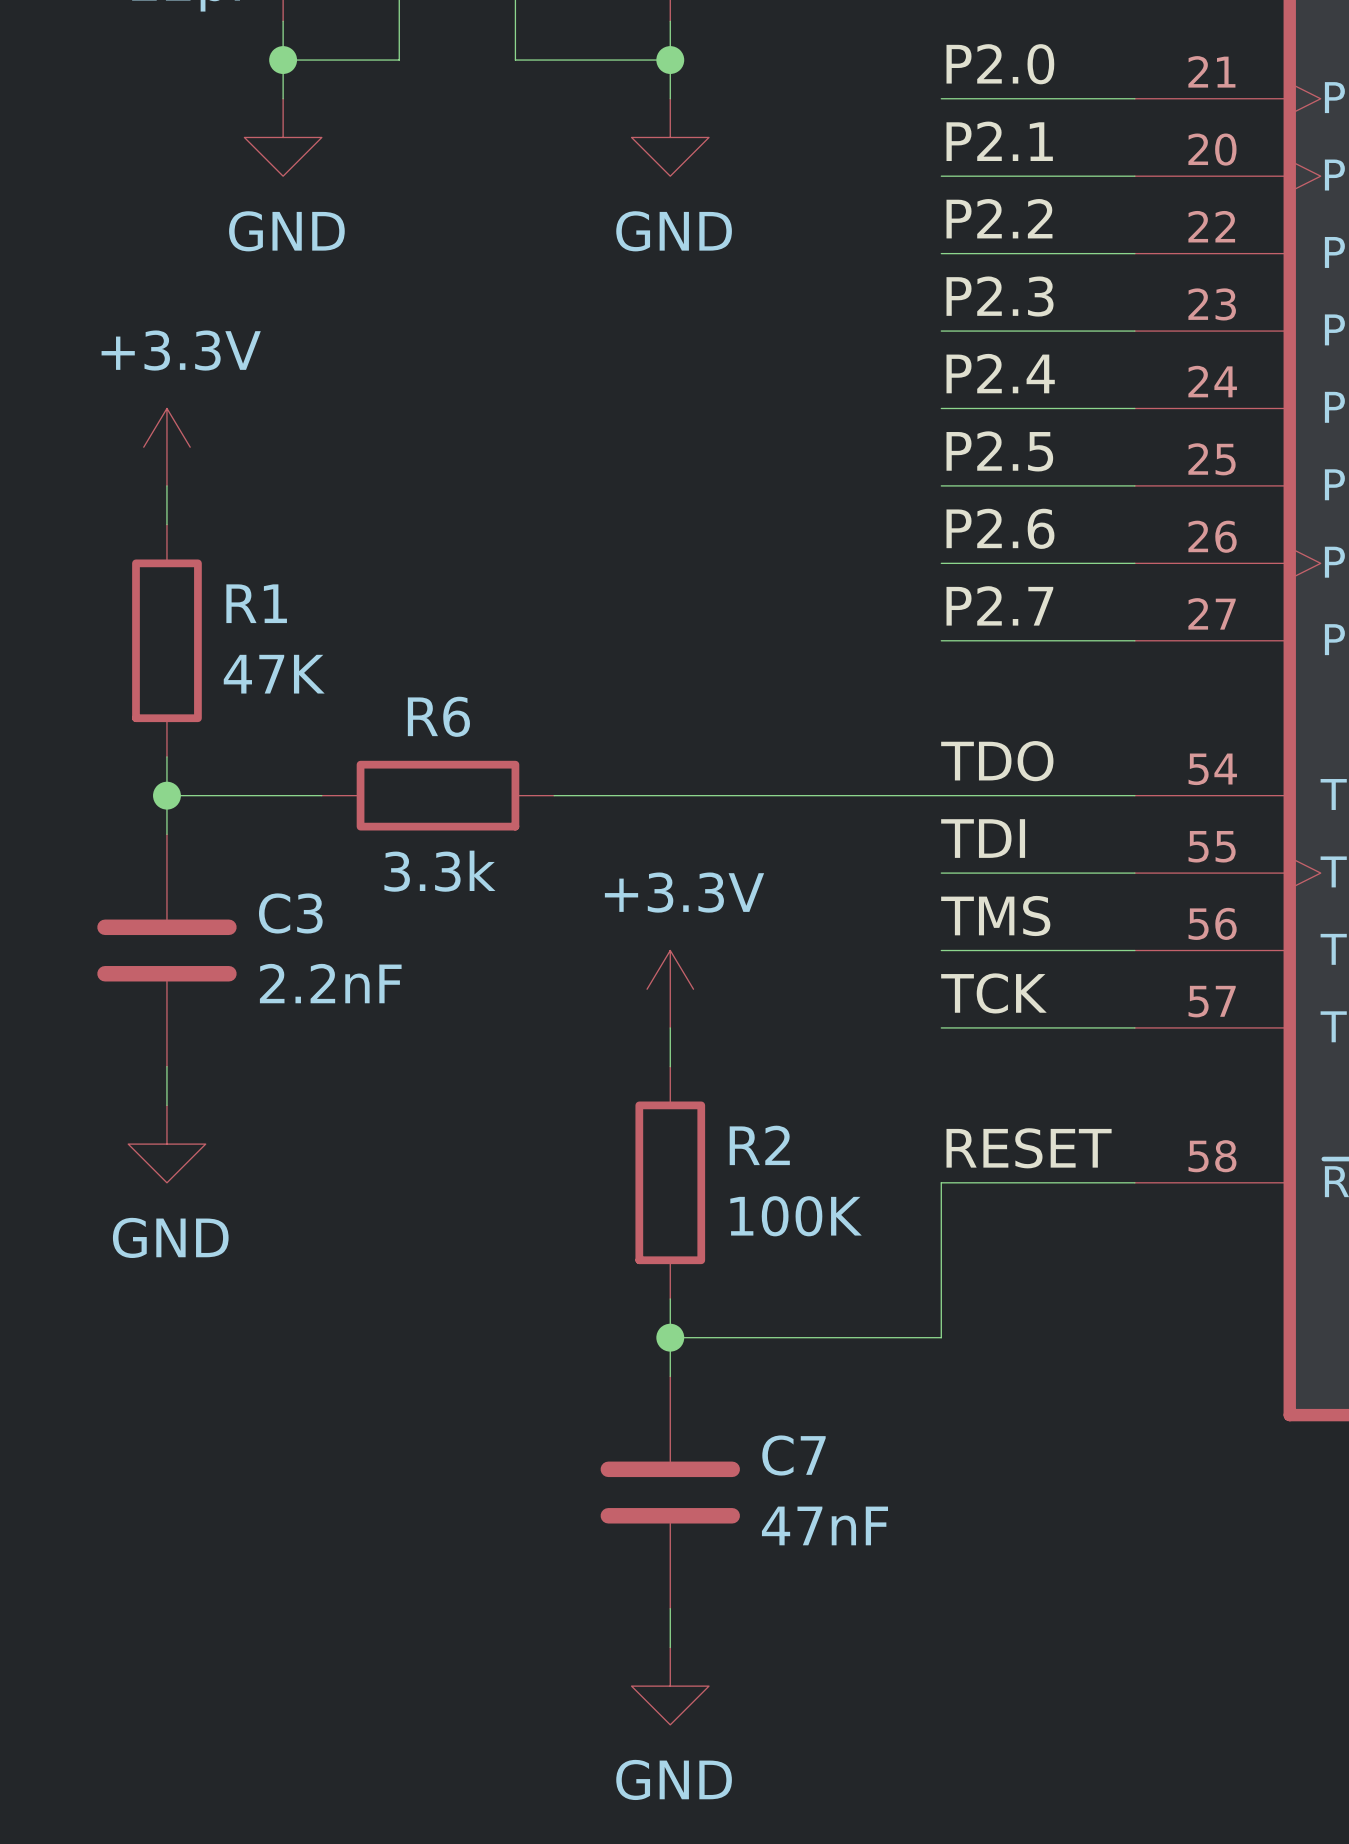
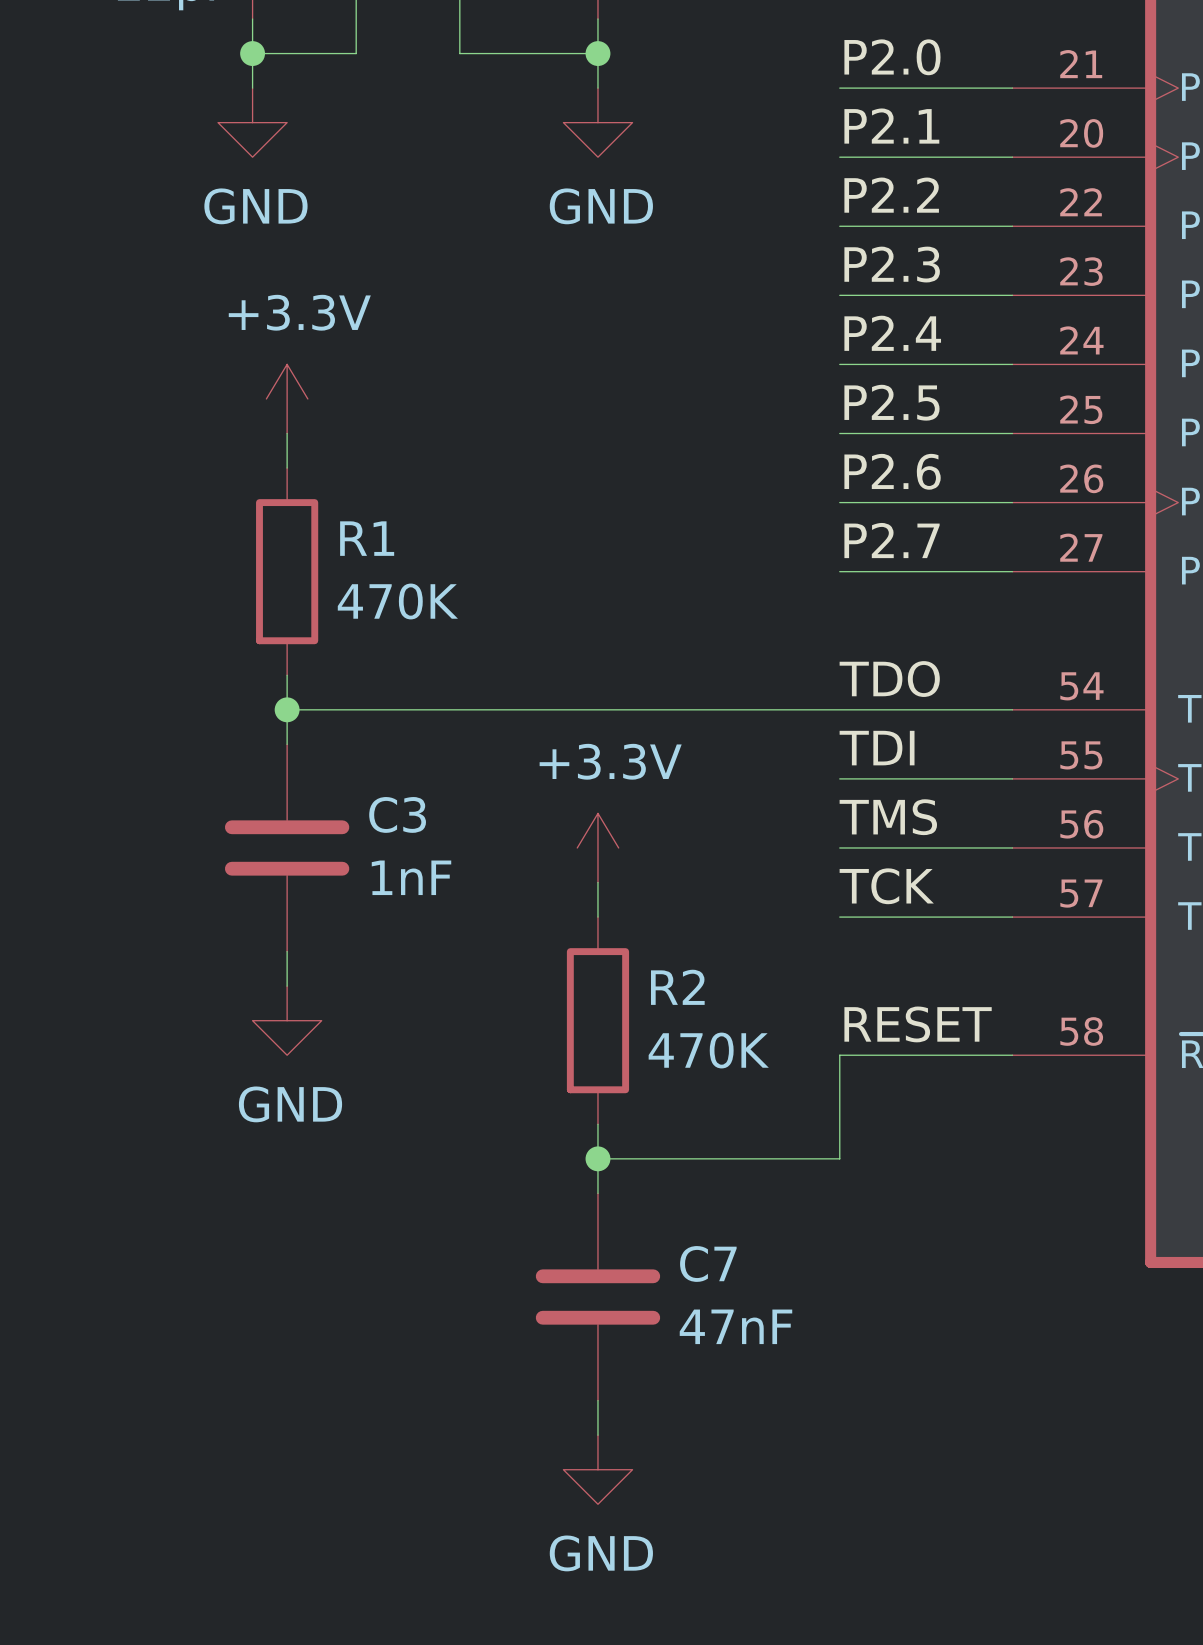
power symbol position: +3.3V (166, 447) -> +3.3V (287, 398)
wire: (166, 485) (166, 524) -> (287, 433) (287, 468)
R1 position: (166, 640) -> (287, 571)
R1 value: 47K (274, 674) -> 470K (397, 601)
wire: (166, 756) (166, 834) -> (287, 675) (287, 744)
wire: (166, 795) (321, 795) -> (494, 709) (287, 709)
junction position: (166, 795) -> (287, 709)
R6: 3.3k (437, 795) -> none
C3 position: (166, 950) -> (287, 847)
C3 value: 2.2nF (330, 983) -> 1nF (411, 877)
power symbol position: +3.3V (670, 989) -> +3.3V (597, 847)
wire: (166, 1066) (166, 1105) -> (287, 951) (287, 986)
power symbol position: GND (166, 1144) -> GND (287, 1020)
R2 position: (670, 1182) -> (597, 1020)
R2 value: 100K (796, 1216) -> 470K (708, 1050)
wire: (941, 1298) (941, 1337) (670, 1337) (670, 1376) -> (839, 1158) (597, 1158) (597, 1124)
junction position: (670, 1337) -> (597, 1158)
C7 position: (670, 1492) -> (597, 1297)
power symbol position: GND (670, 1686) -> GND (597, 1469)

